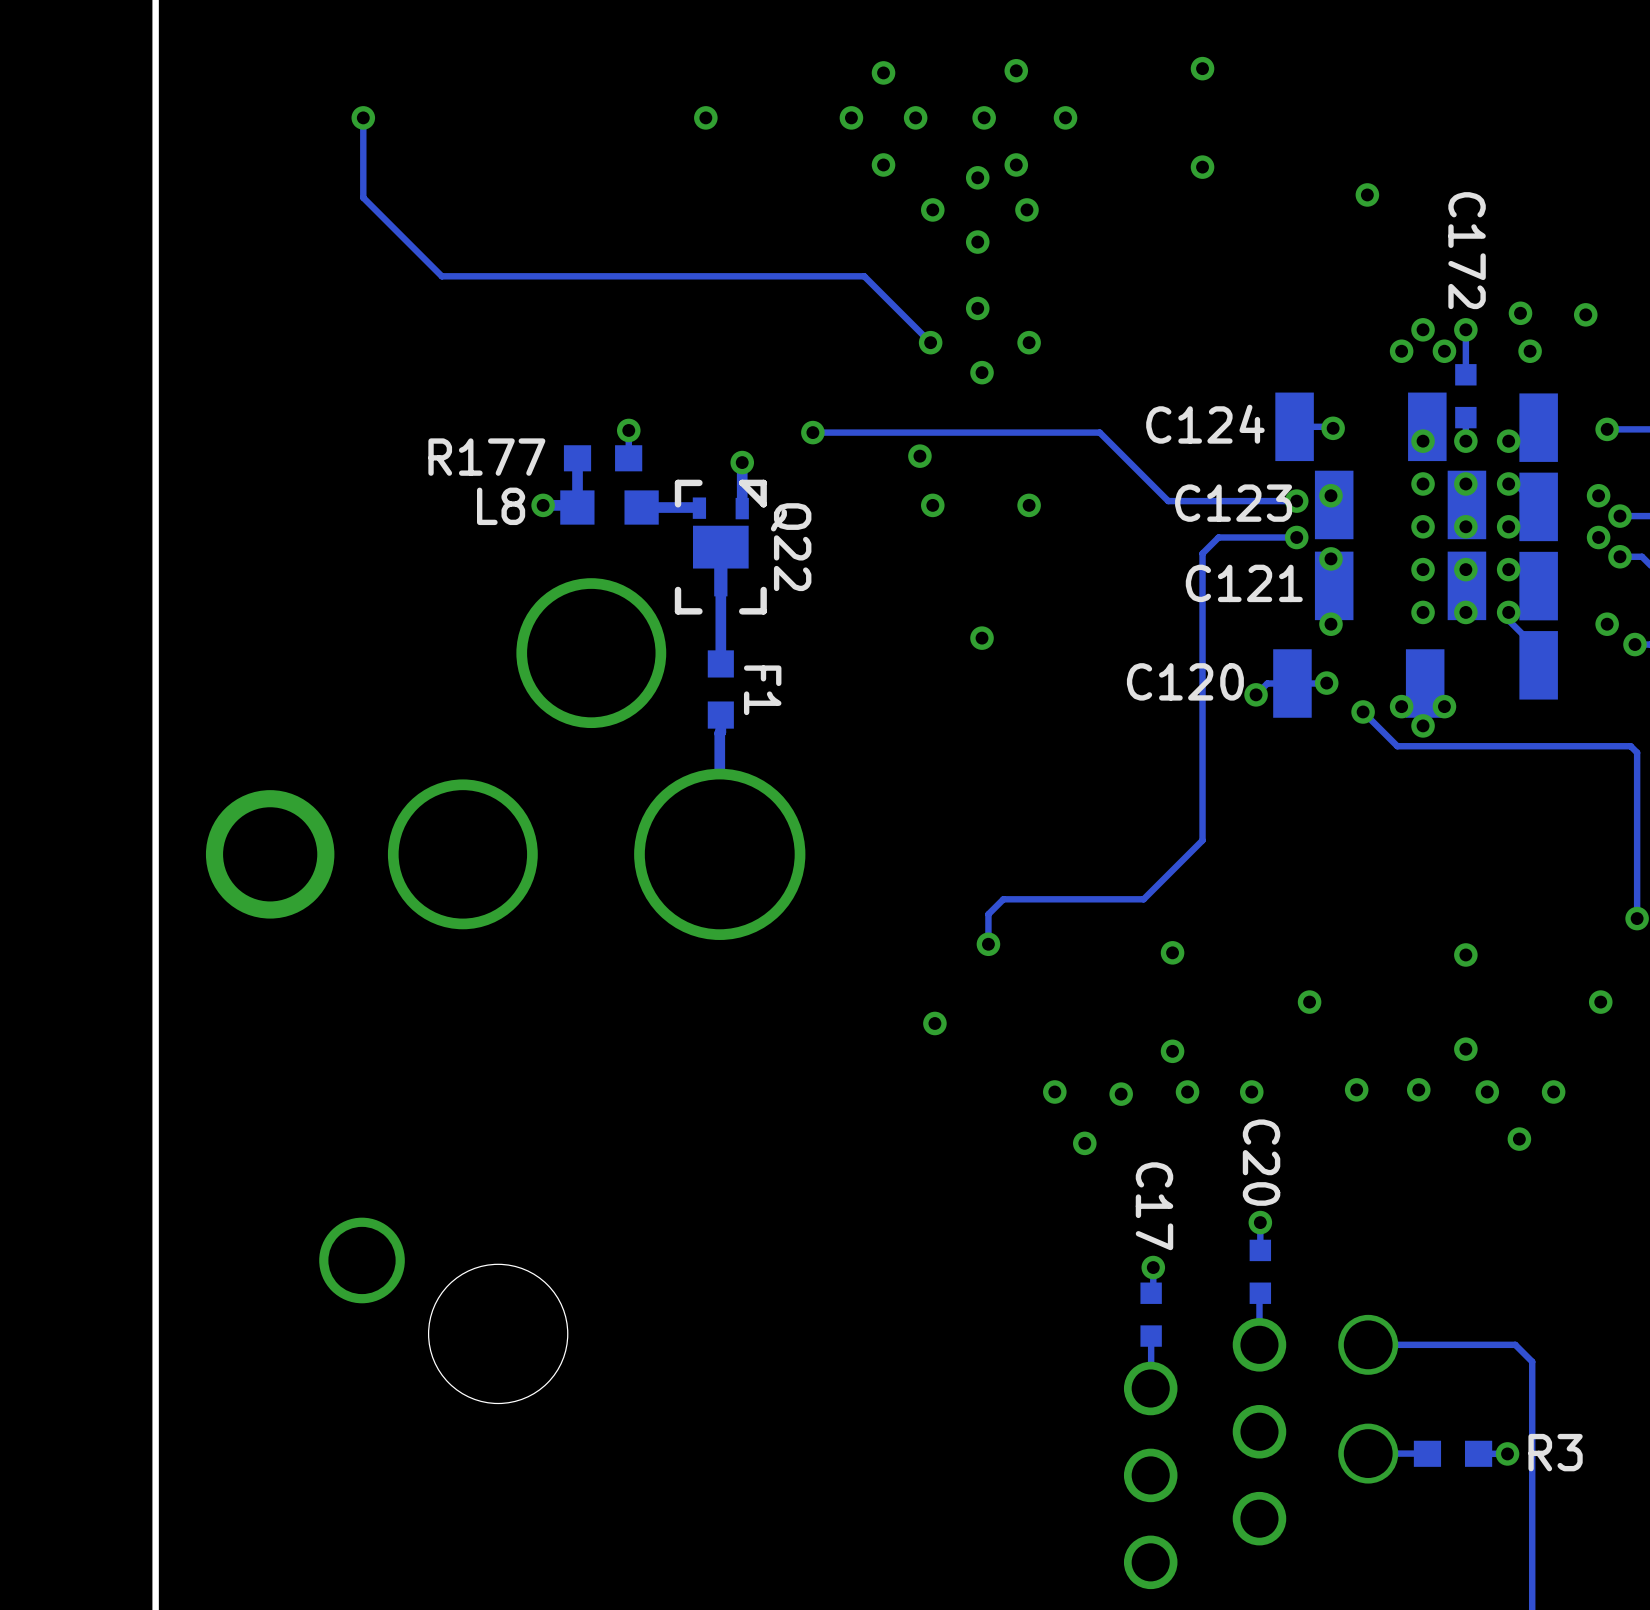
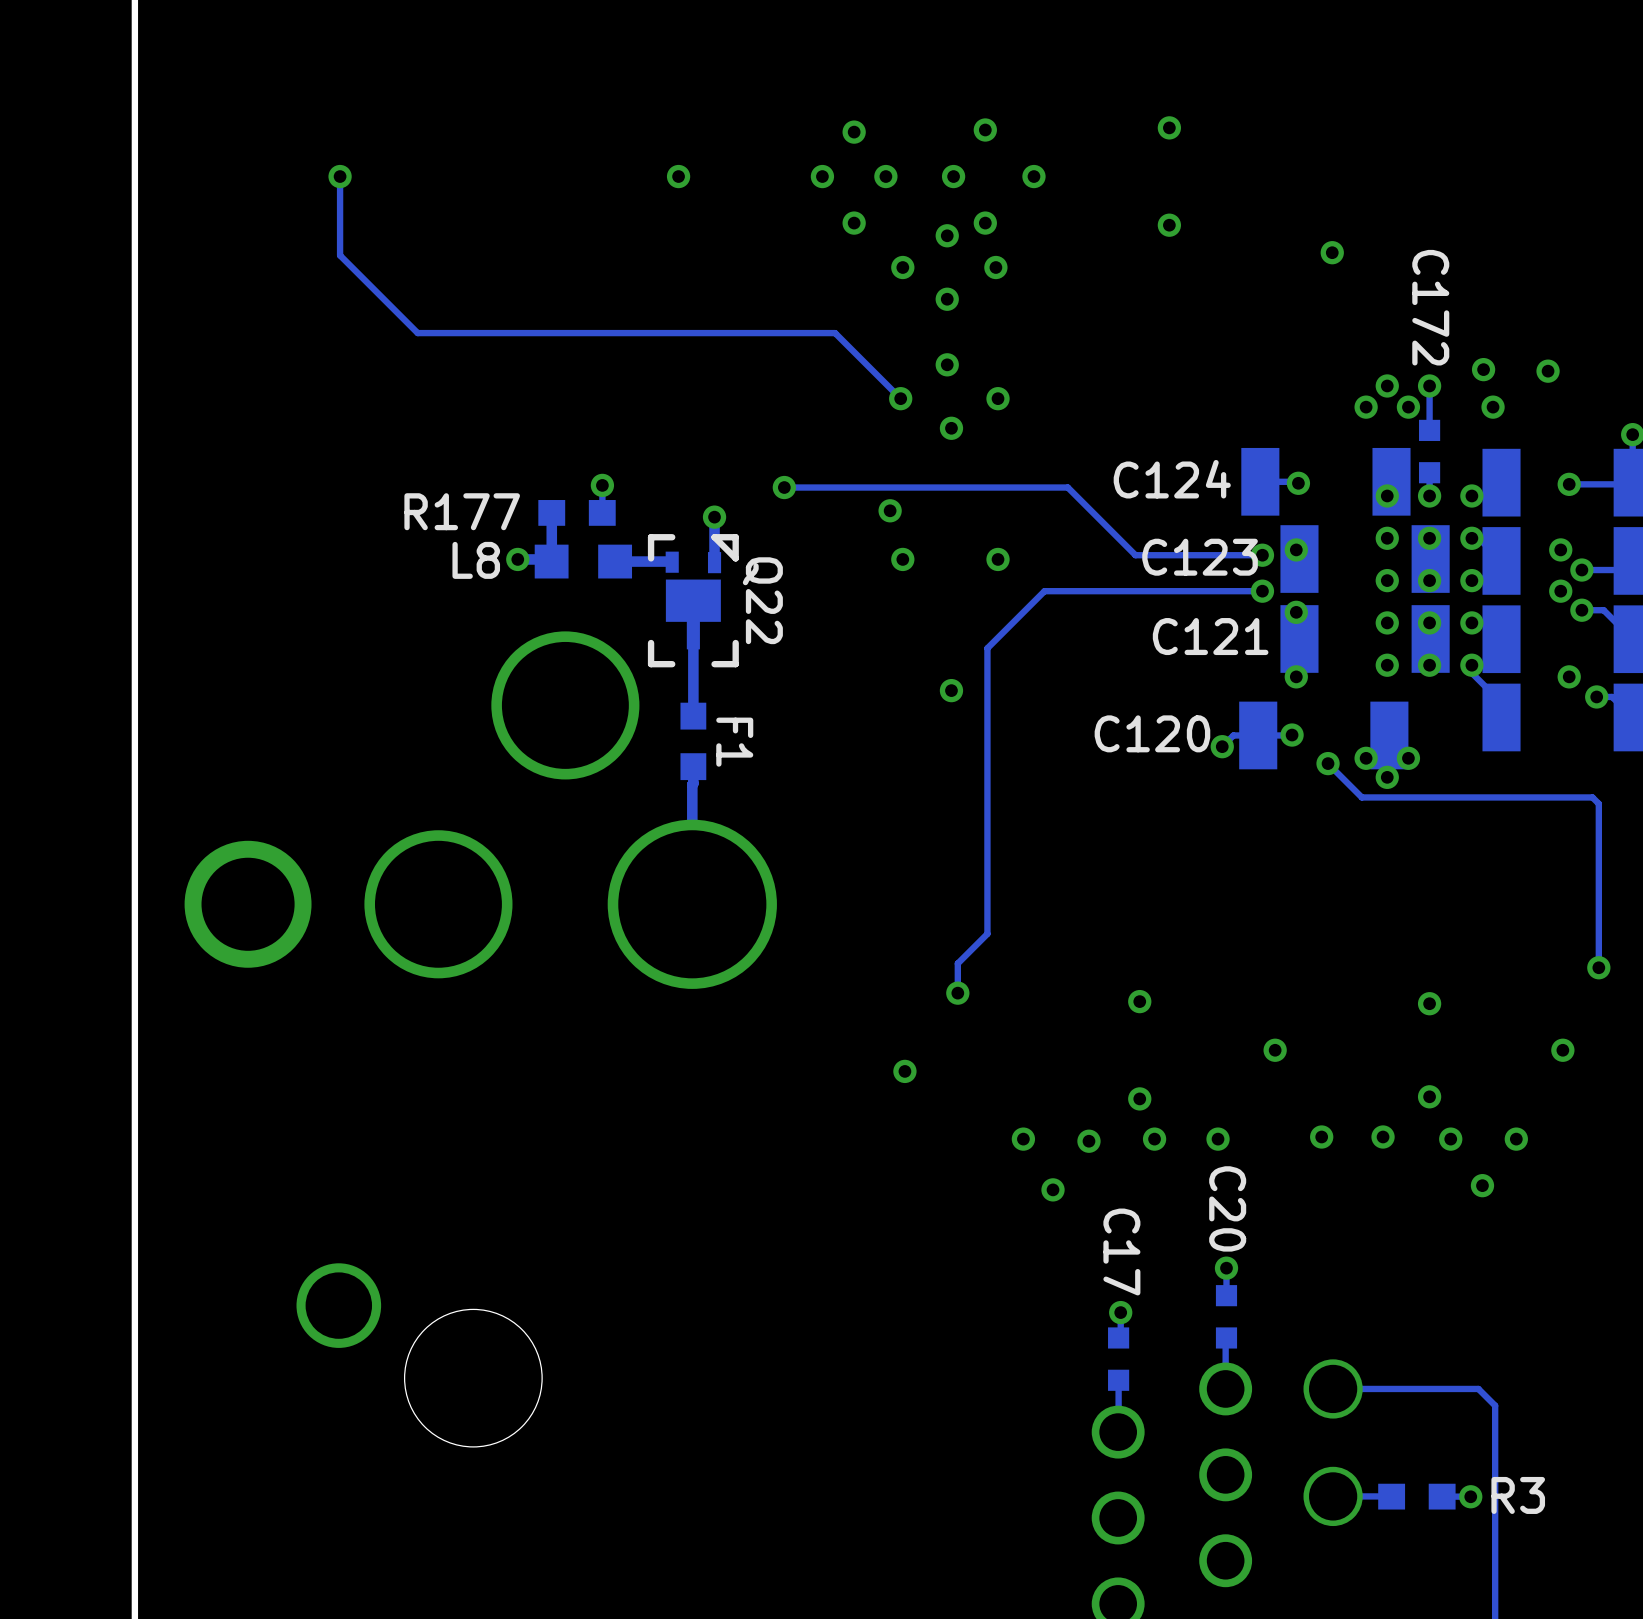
track: (1218, 537) (1202, 553) (1202, 840) (1143, 899) (1003, 899) -> (1185, 591) (1044, 591) (987, 648) (987, 933) (972, 948)

